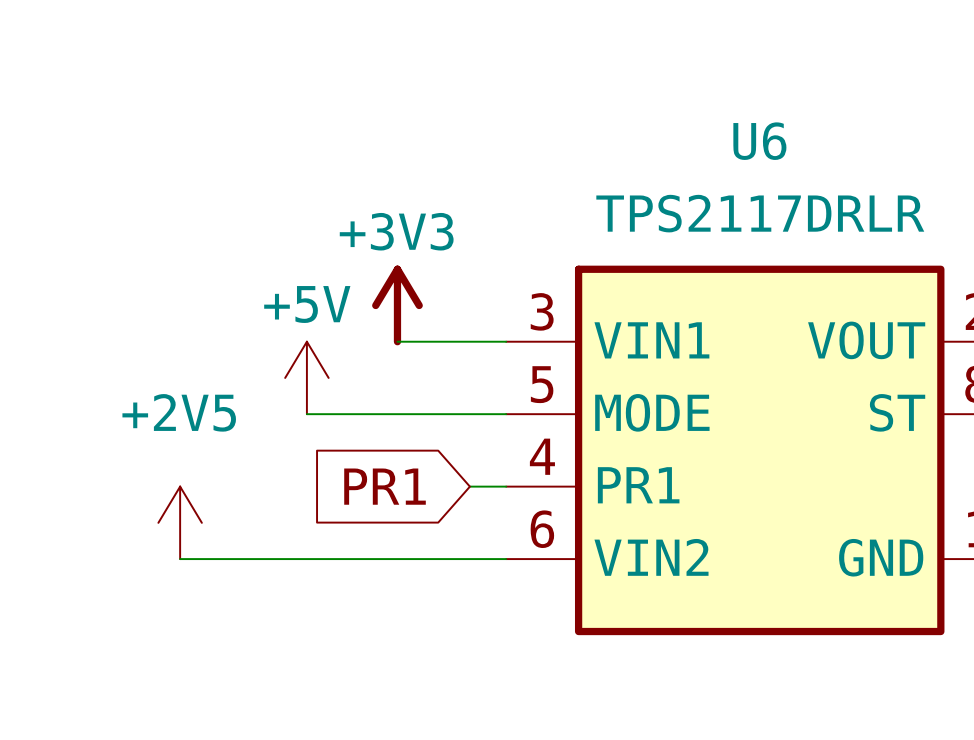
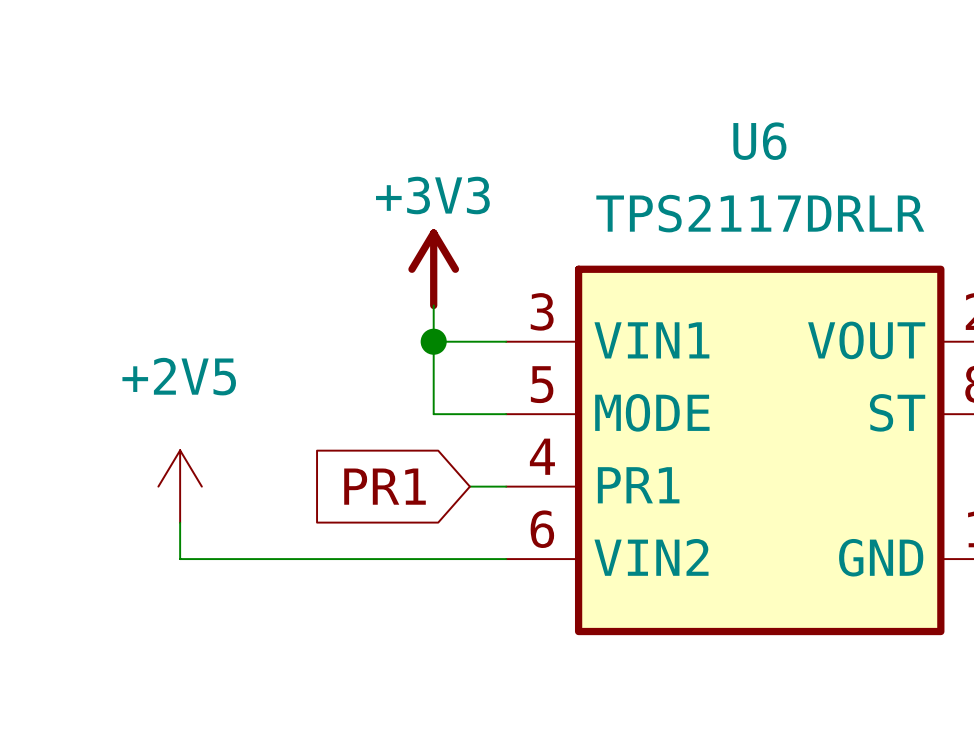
power symbol position: +3V3 (397, 305) -> +3V3 (433, 269)
wire: (397, 341) (433, 341) -> none
junction: none -> (433, 341)
power symbol: +5V (306, 377) -> none
wire: (306, 414) (433, 414) -> (433, 305) (433, 414)
power symbol position: +2V5 (180, 522) -> +2V5 (180, 486)

